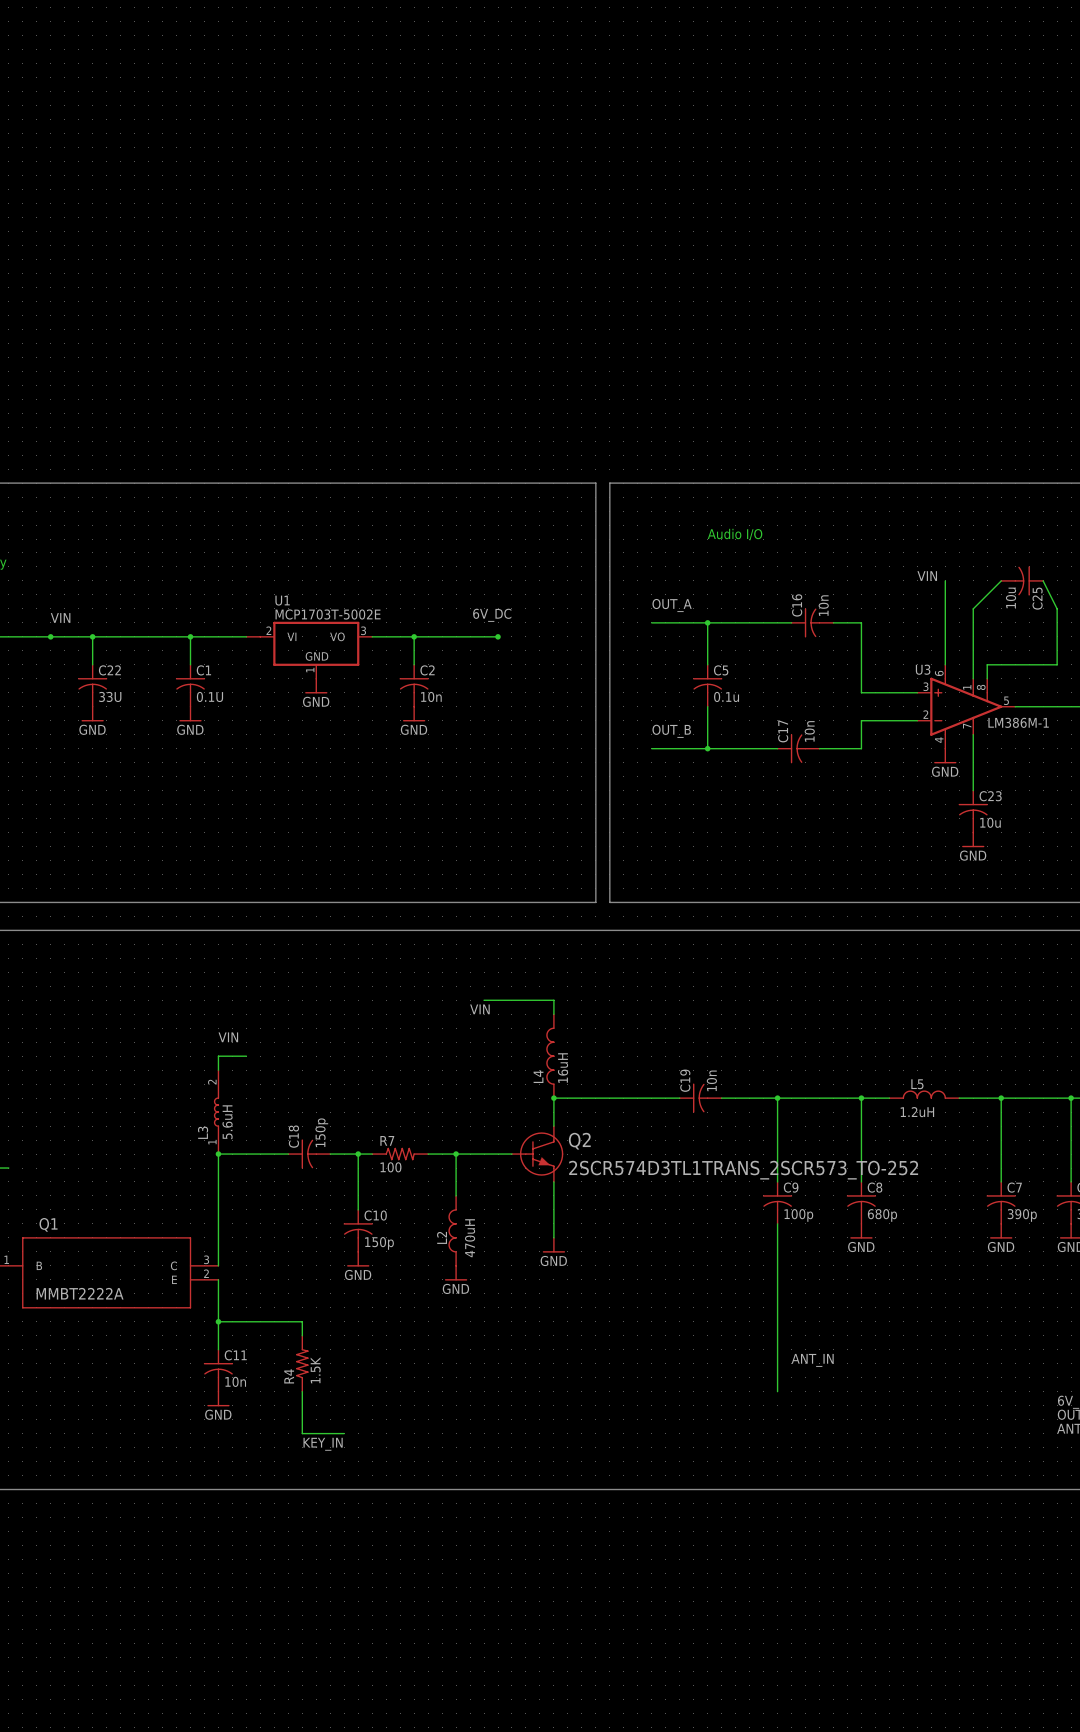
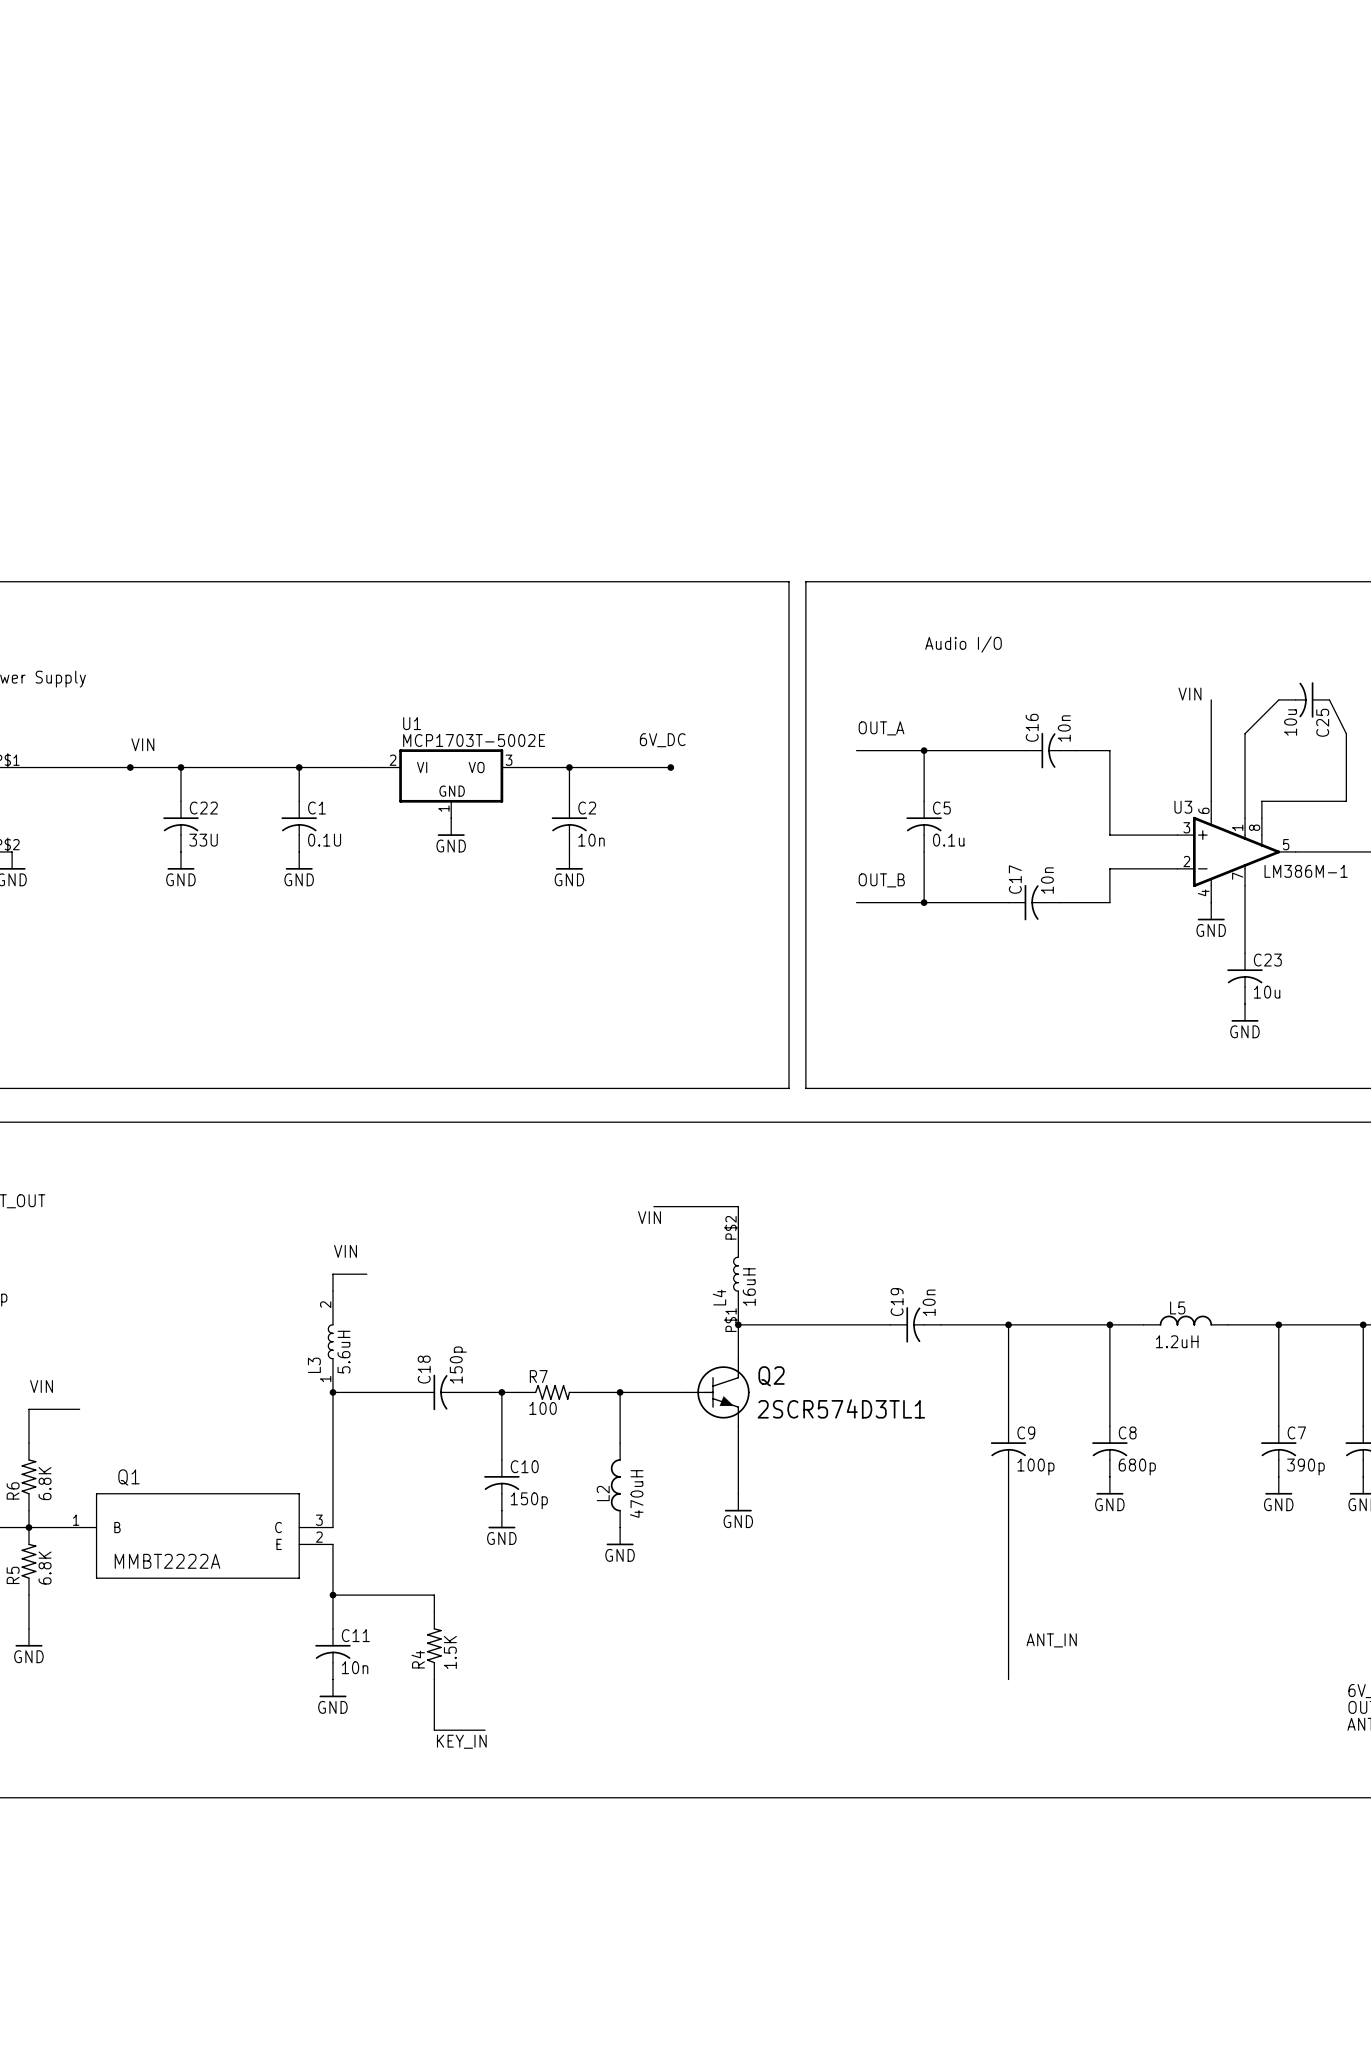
L4 symbol: [546, 1014, 555, 1099] -> [733, 1223, 739, 1325]
Q2 value: 2SCR574D3TL1TRANS_2SCR573_TO-252 (743, 1170) -> 2SCR574D3TL1 (841, 1408)

